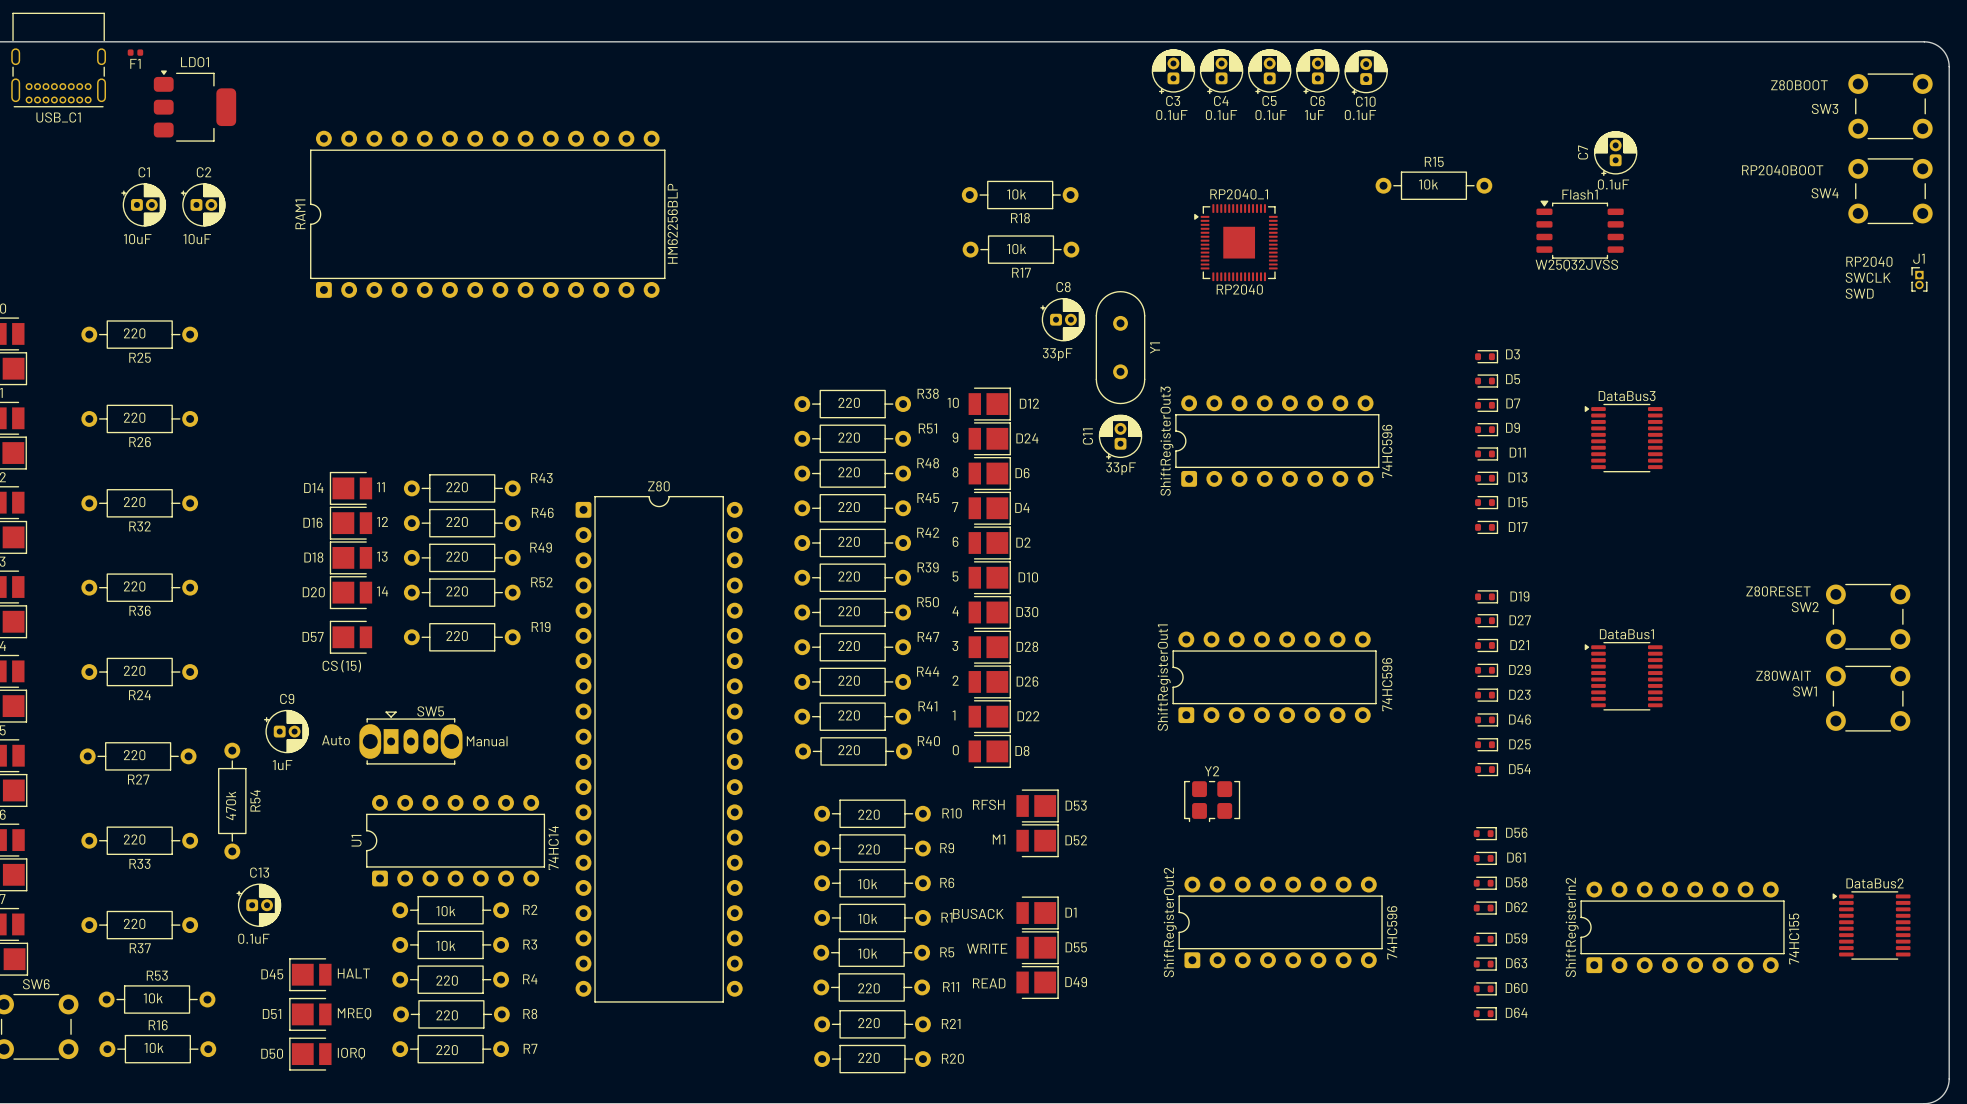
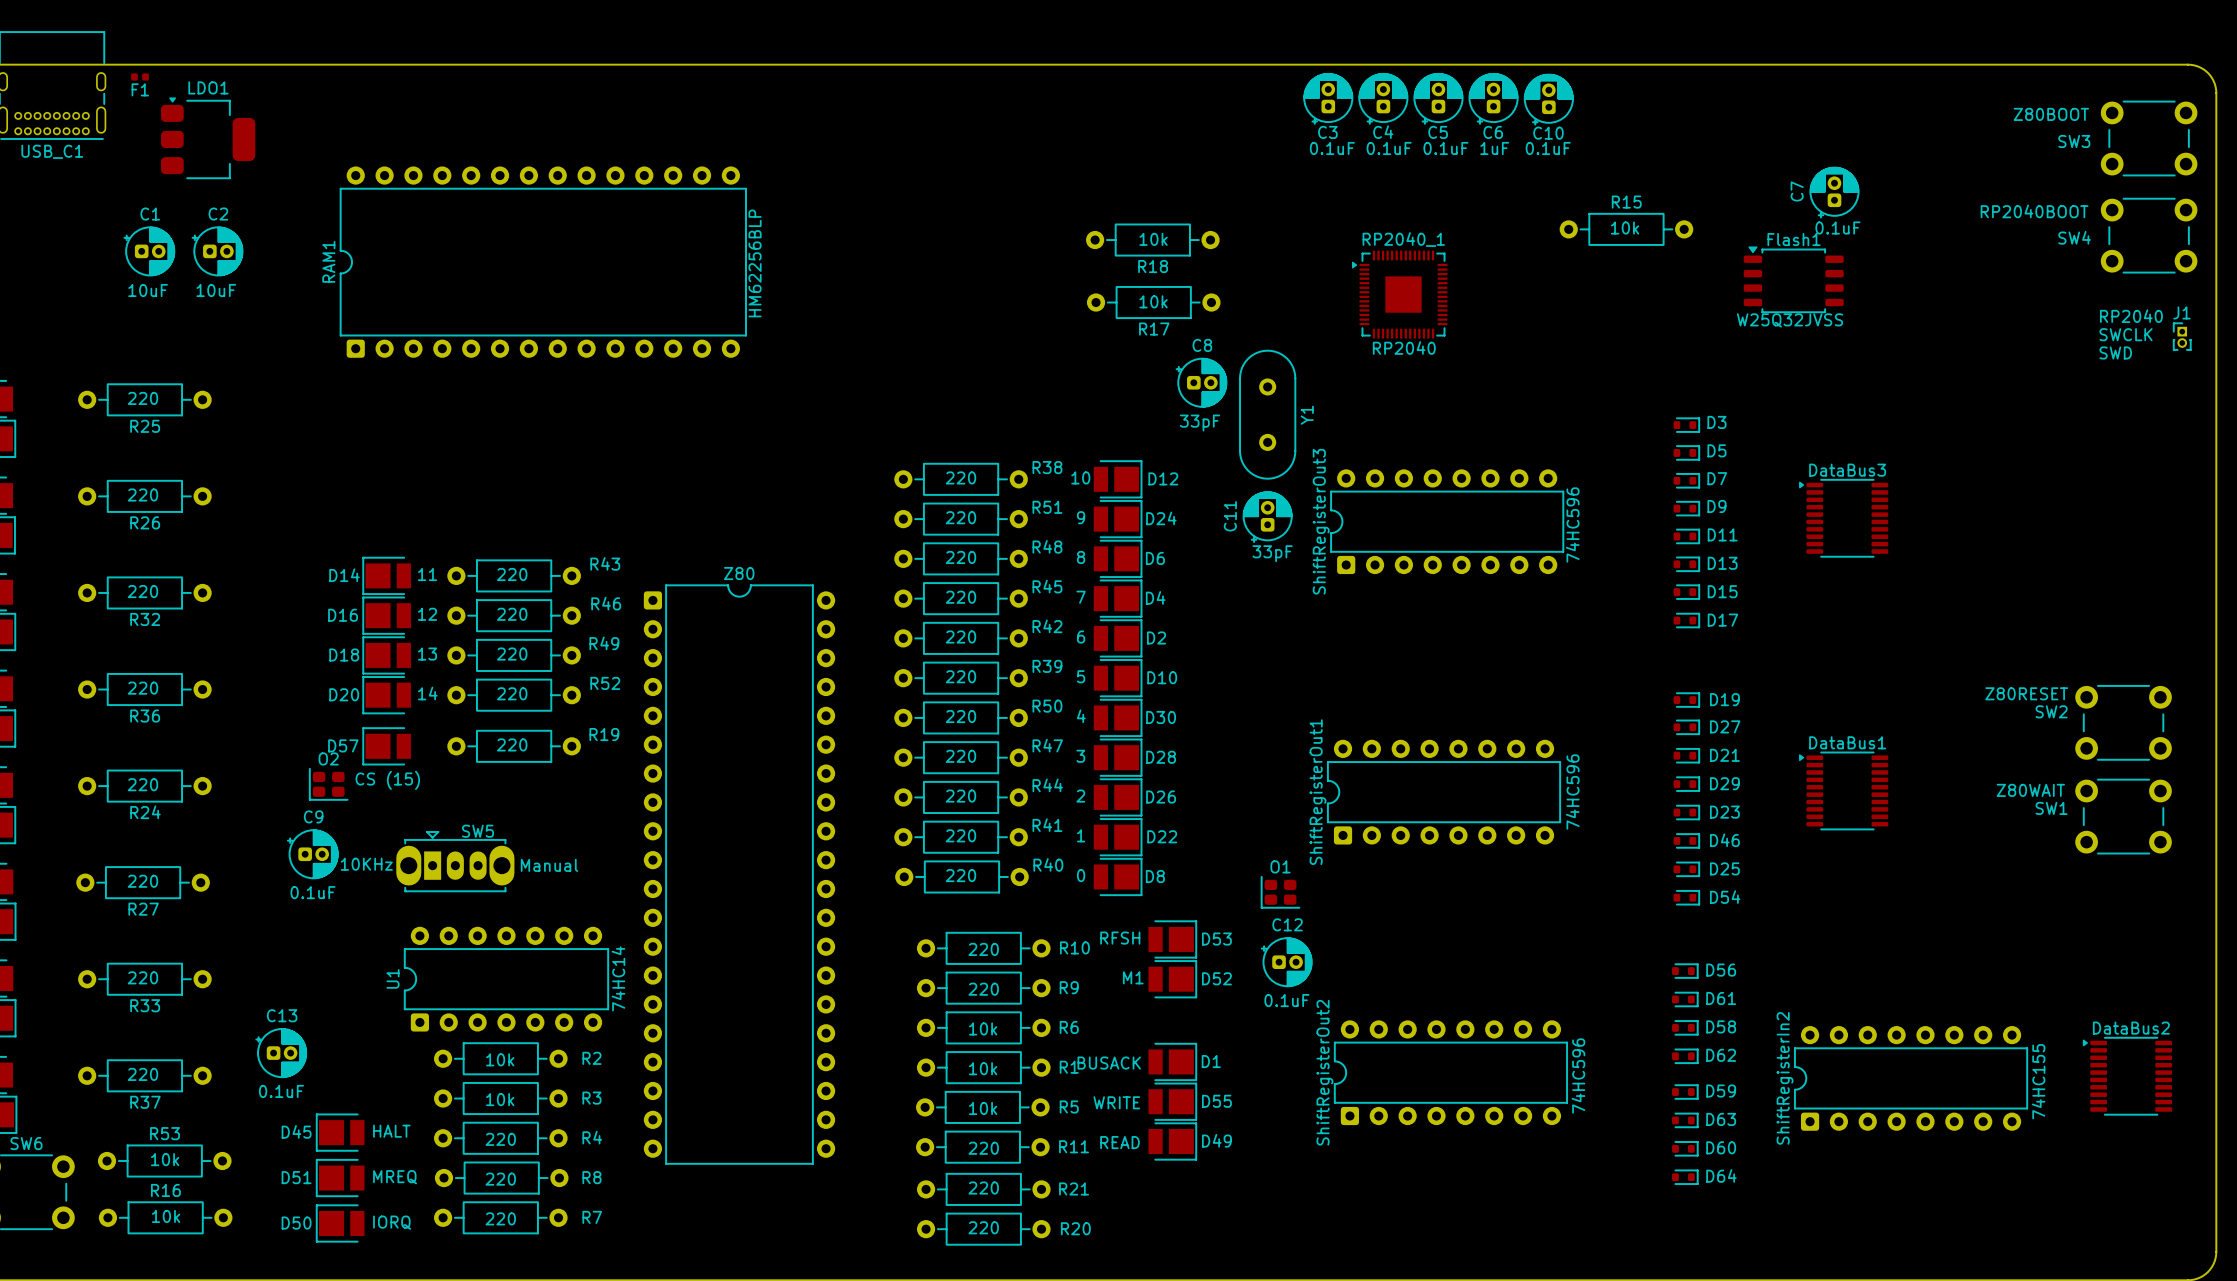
O2: none -> (328, 784)
text: none -> 10KHz (366, 864)
text: Auto (335, 740) -> none
O1: none -> (1280, 892)
text: 1uF (282, 765) -> 0.1uF (313, 892)
R54: (232, 801) -> none
Y2: (1212, 801) -> none
text: 470k (231, 805) -> none
C12: none -> (1286, 962)
text: none -> 0.1uF (1286, 1000)

